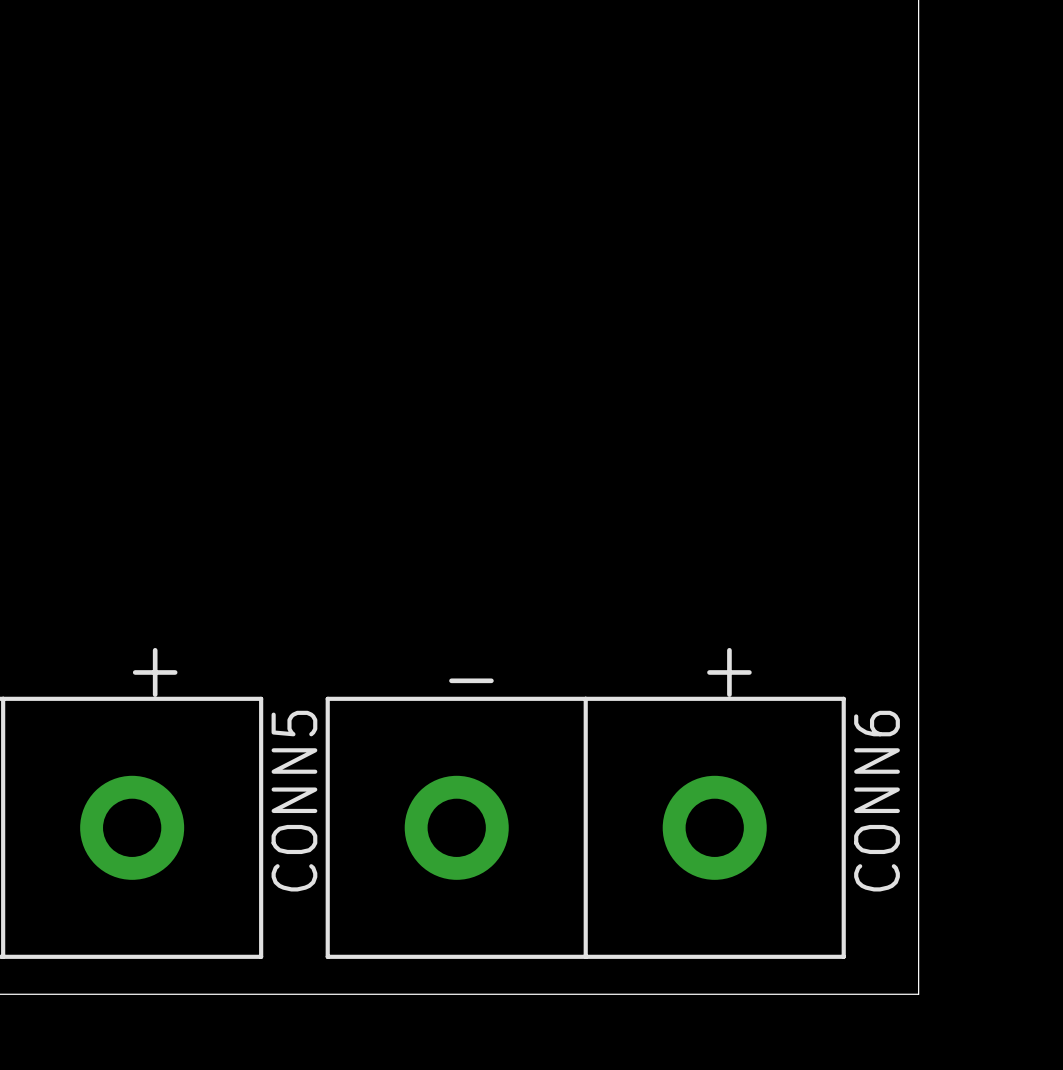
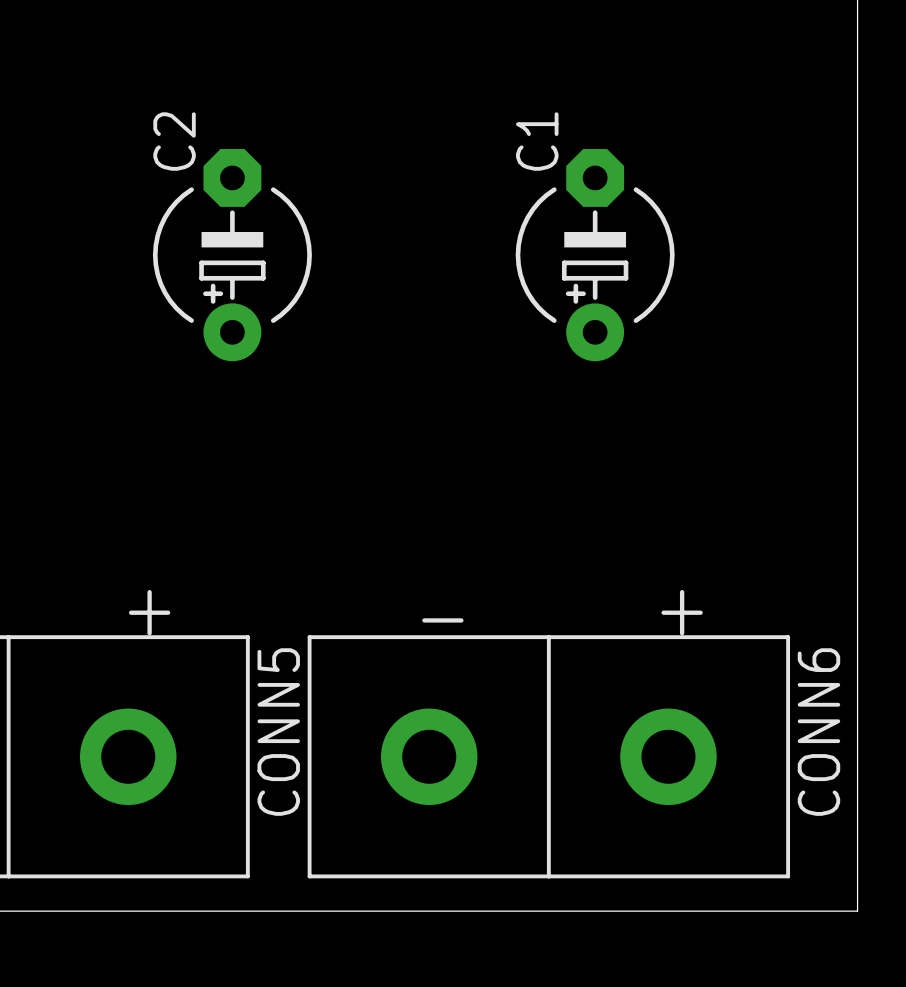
C2: none -> (232, 255)
C1: none -> (595, 255)

